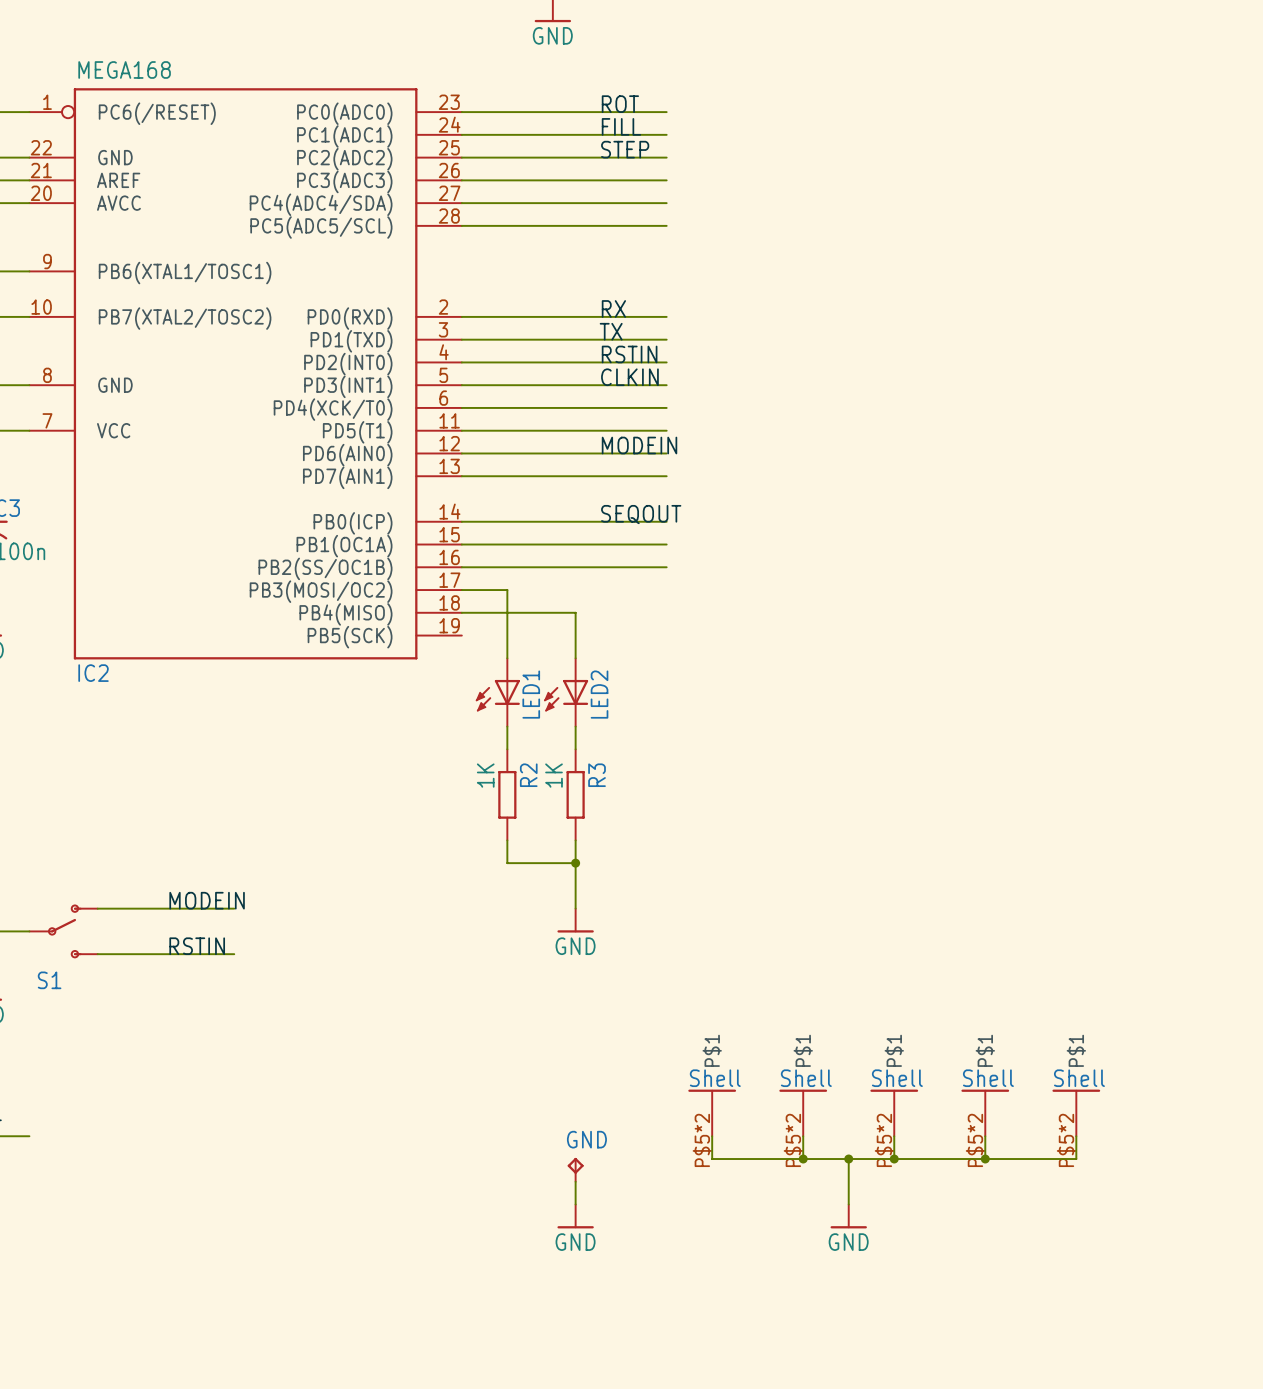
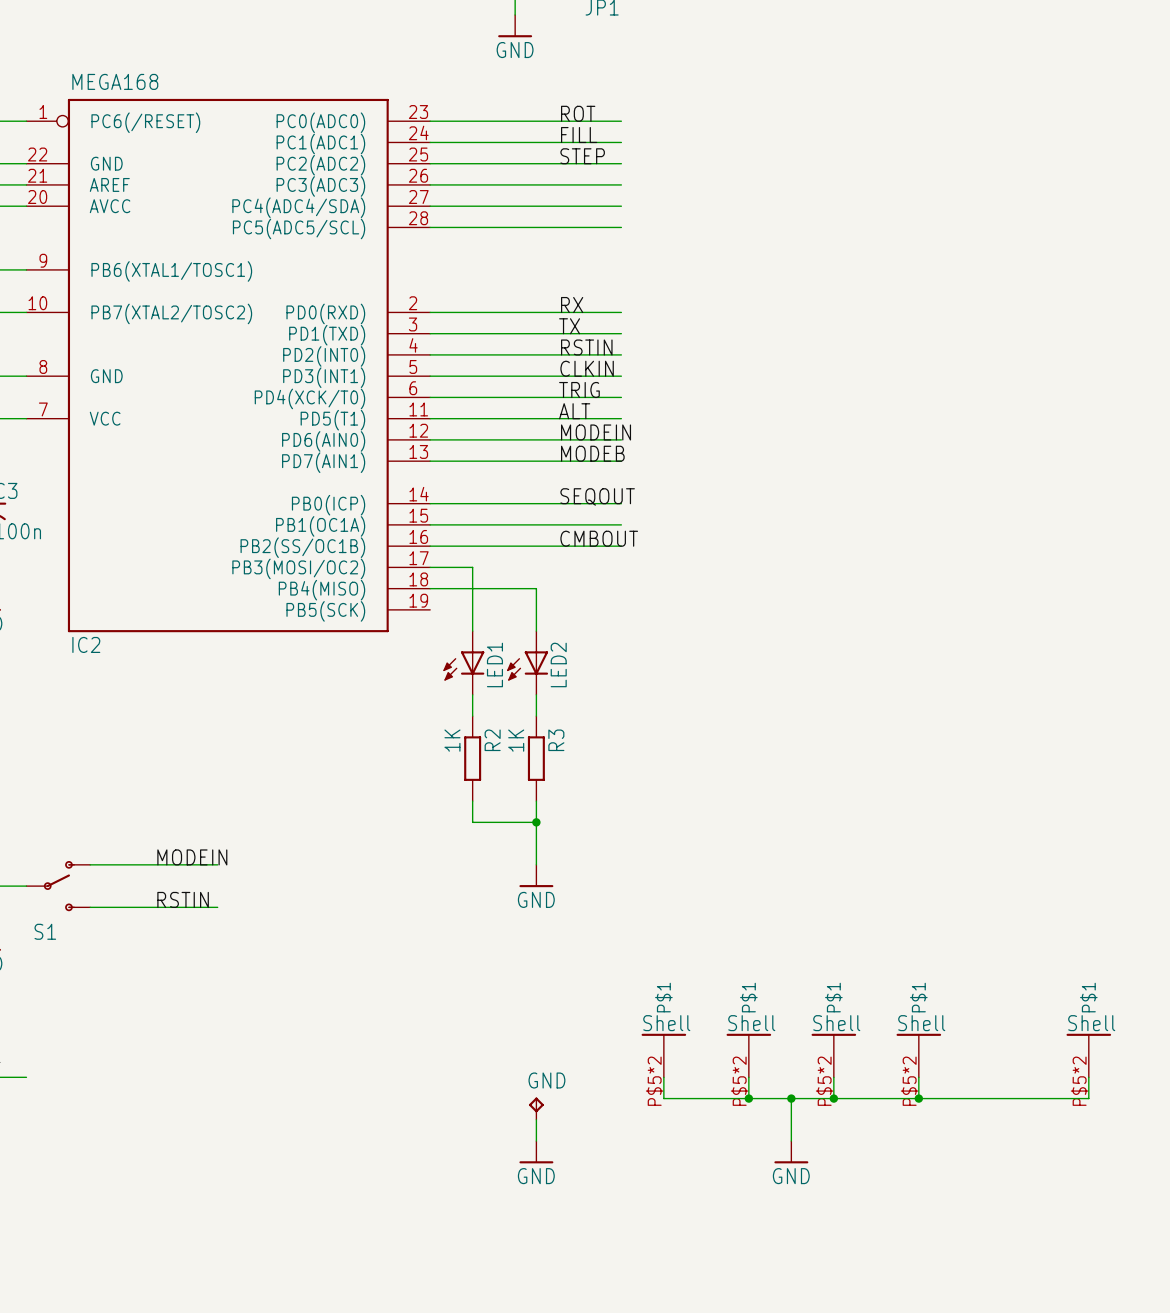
label: none -> TRIG (579, 389)
label: none -> ALT (574, 411)
label: none -> MODEB (592, 453)
label: none -> CMBOUT (599, 538)
part position: (1076, 1112) -> (1088, 1055)
wire: (1076, 1136) (1076, 1159) -> (1088, 1077) (1088, 1098) (1003, 1098)

